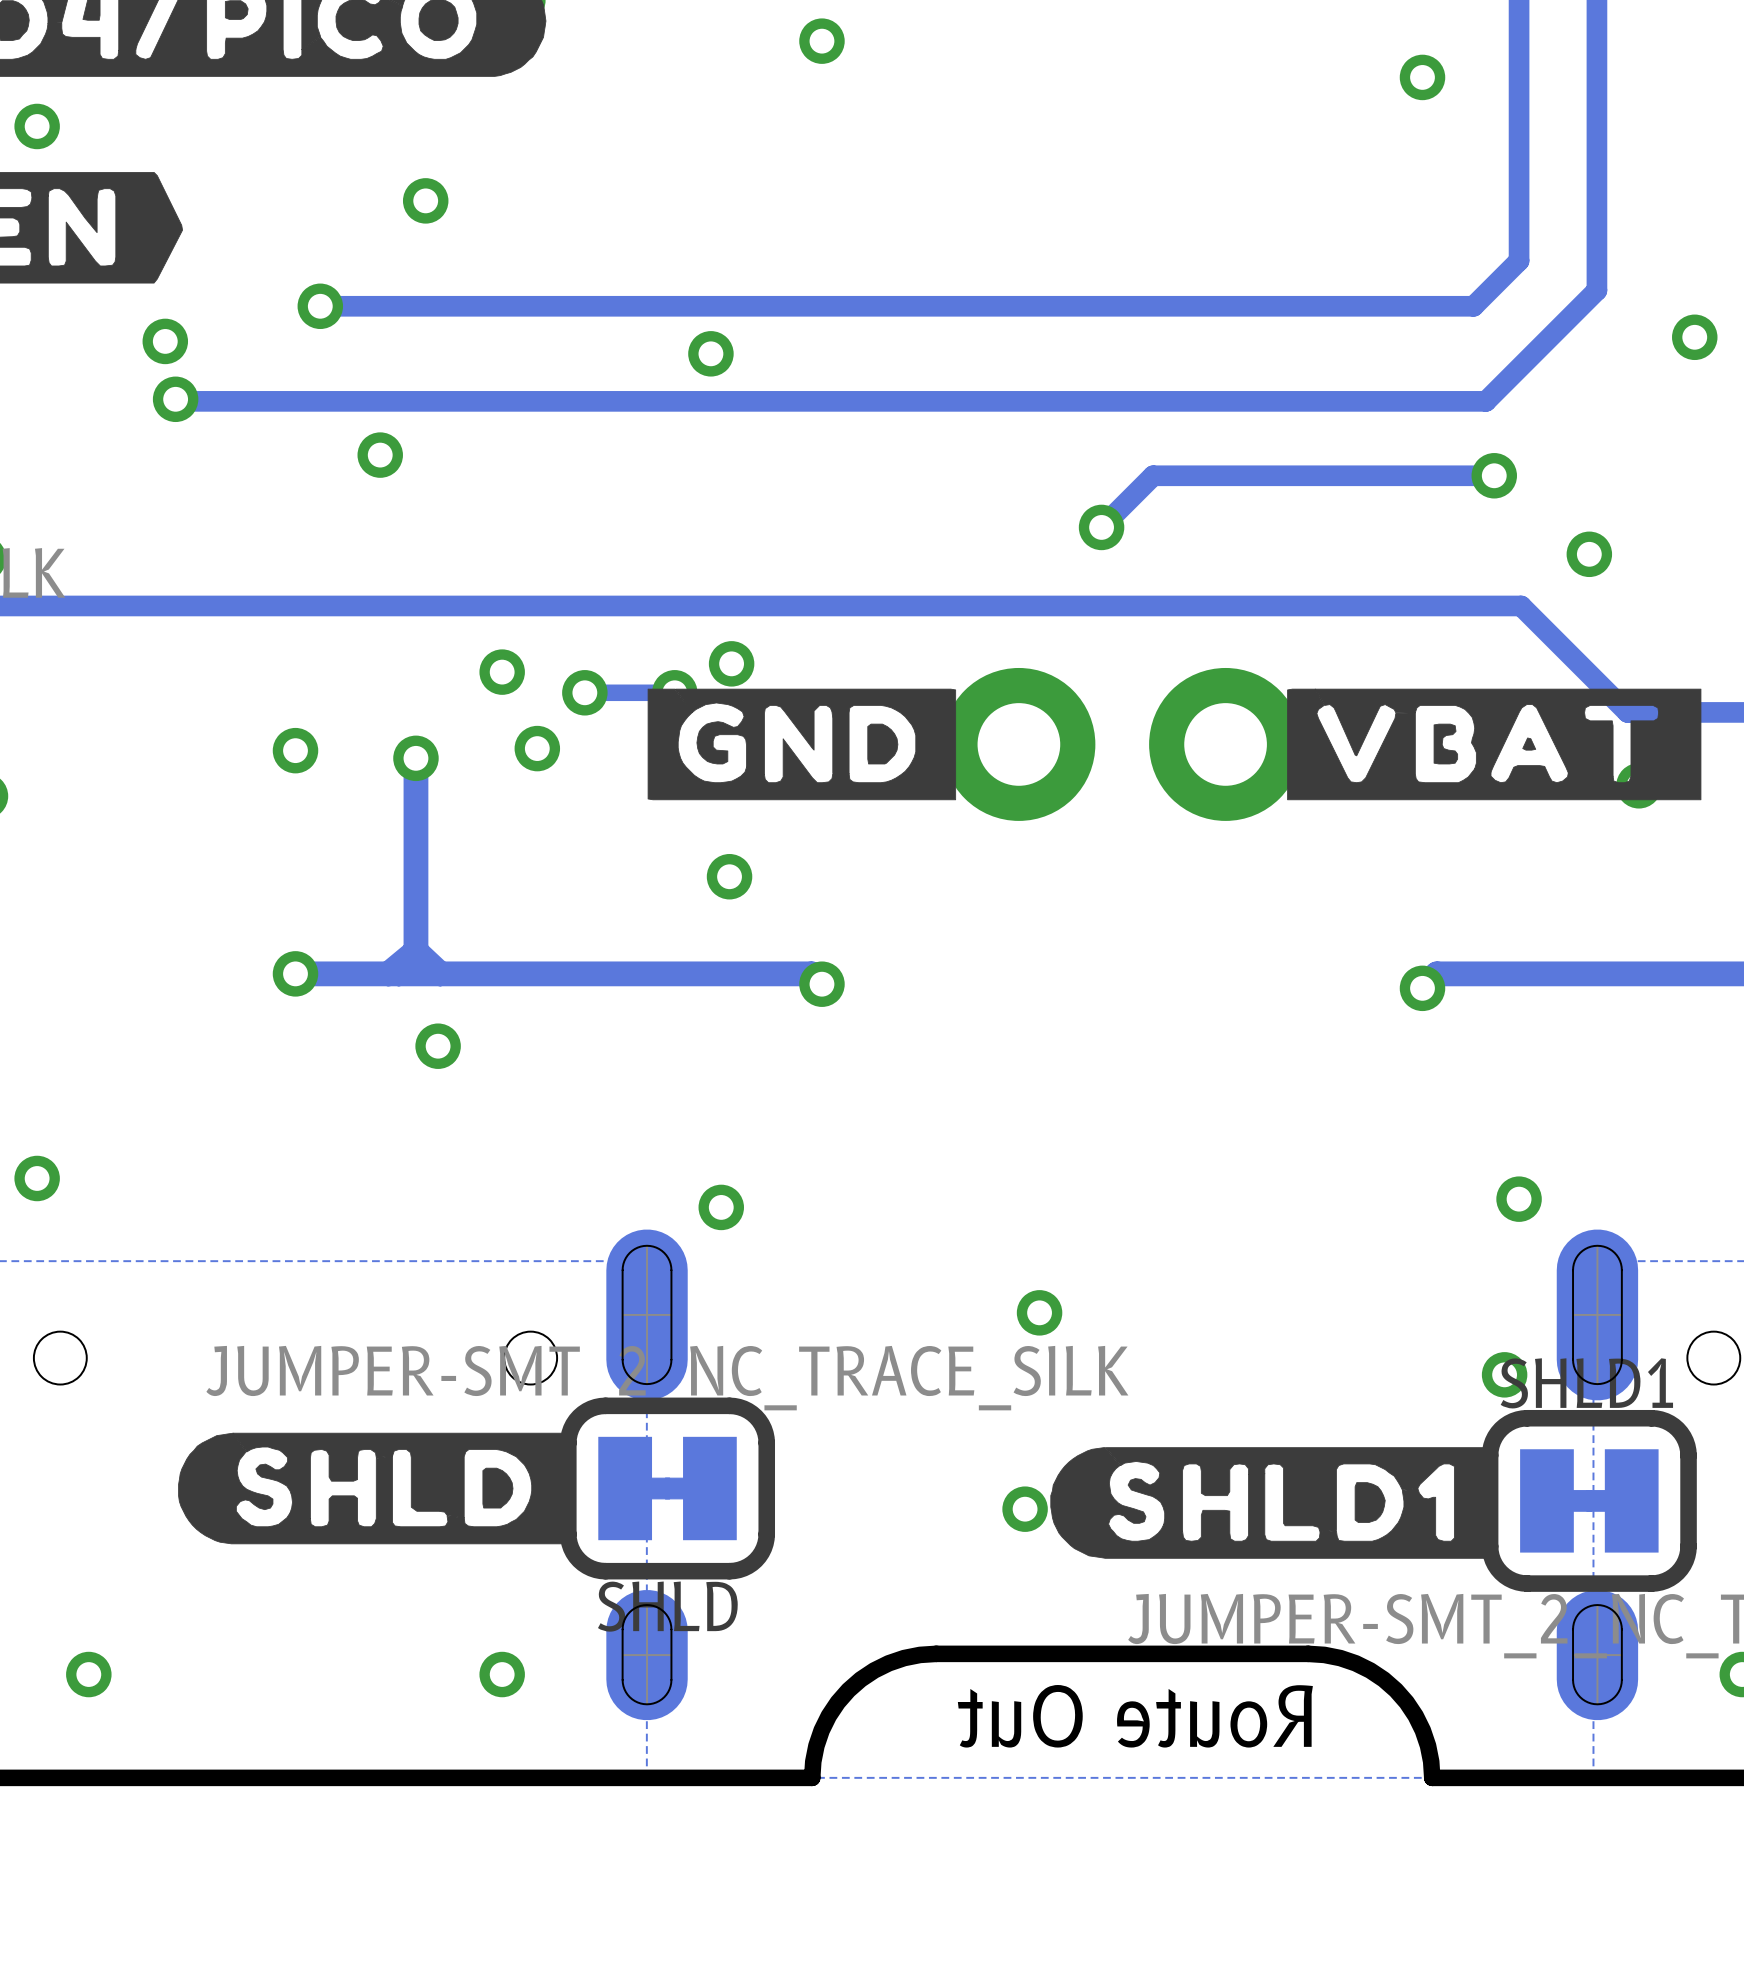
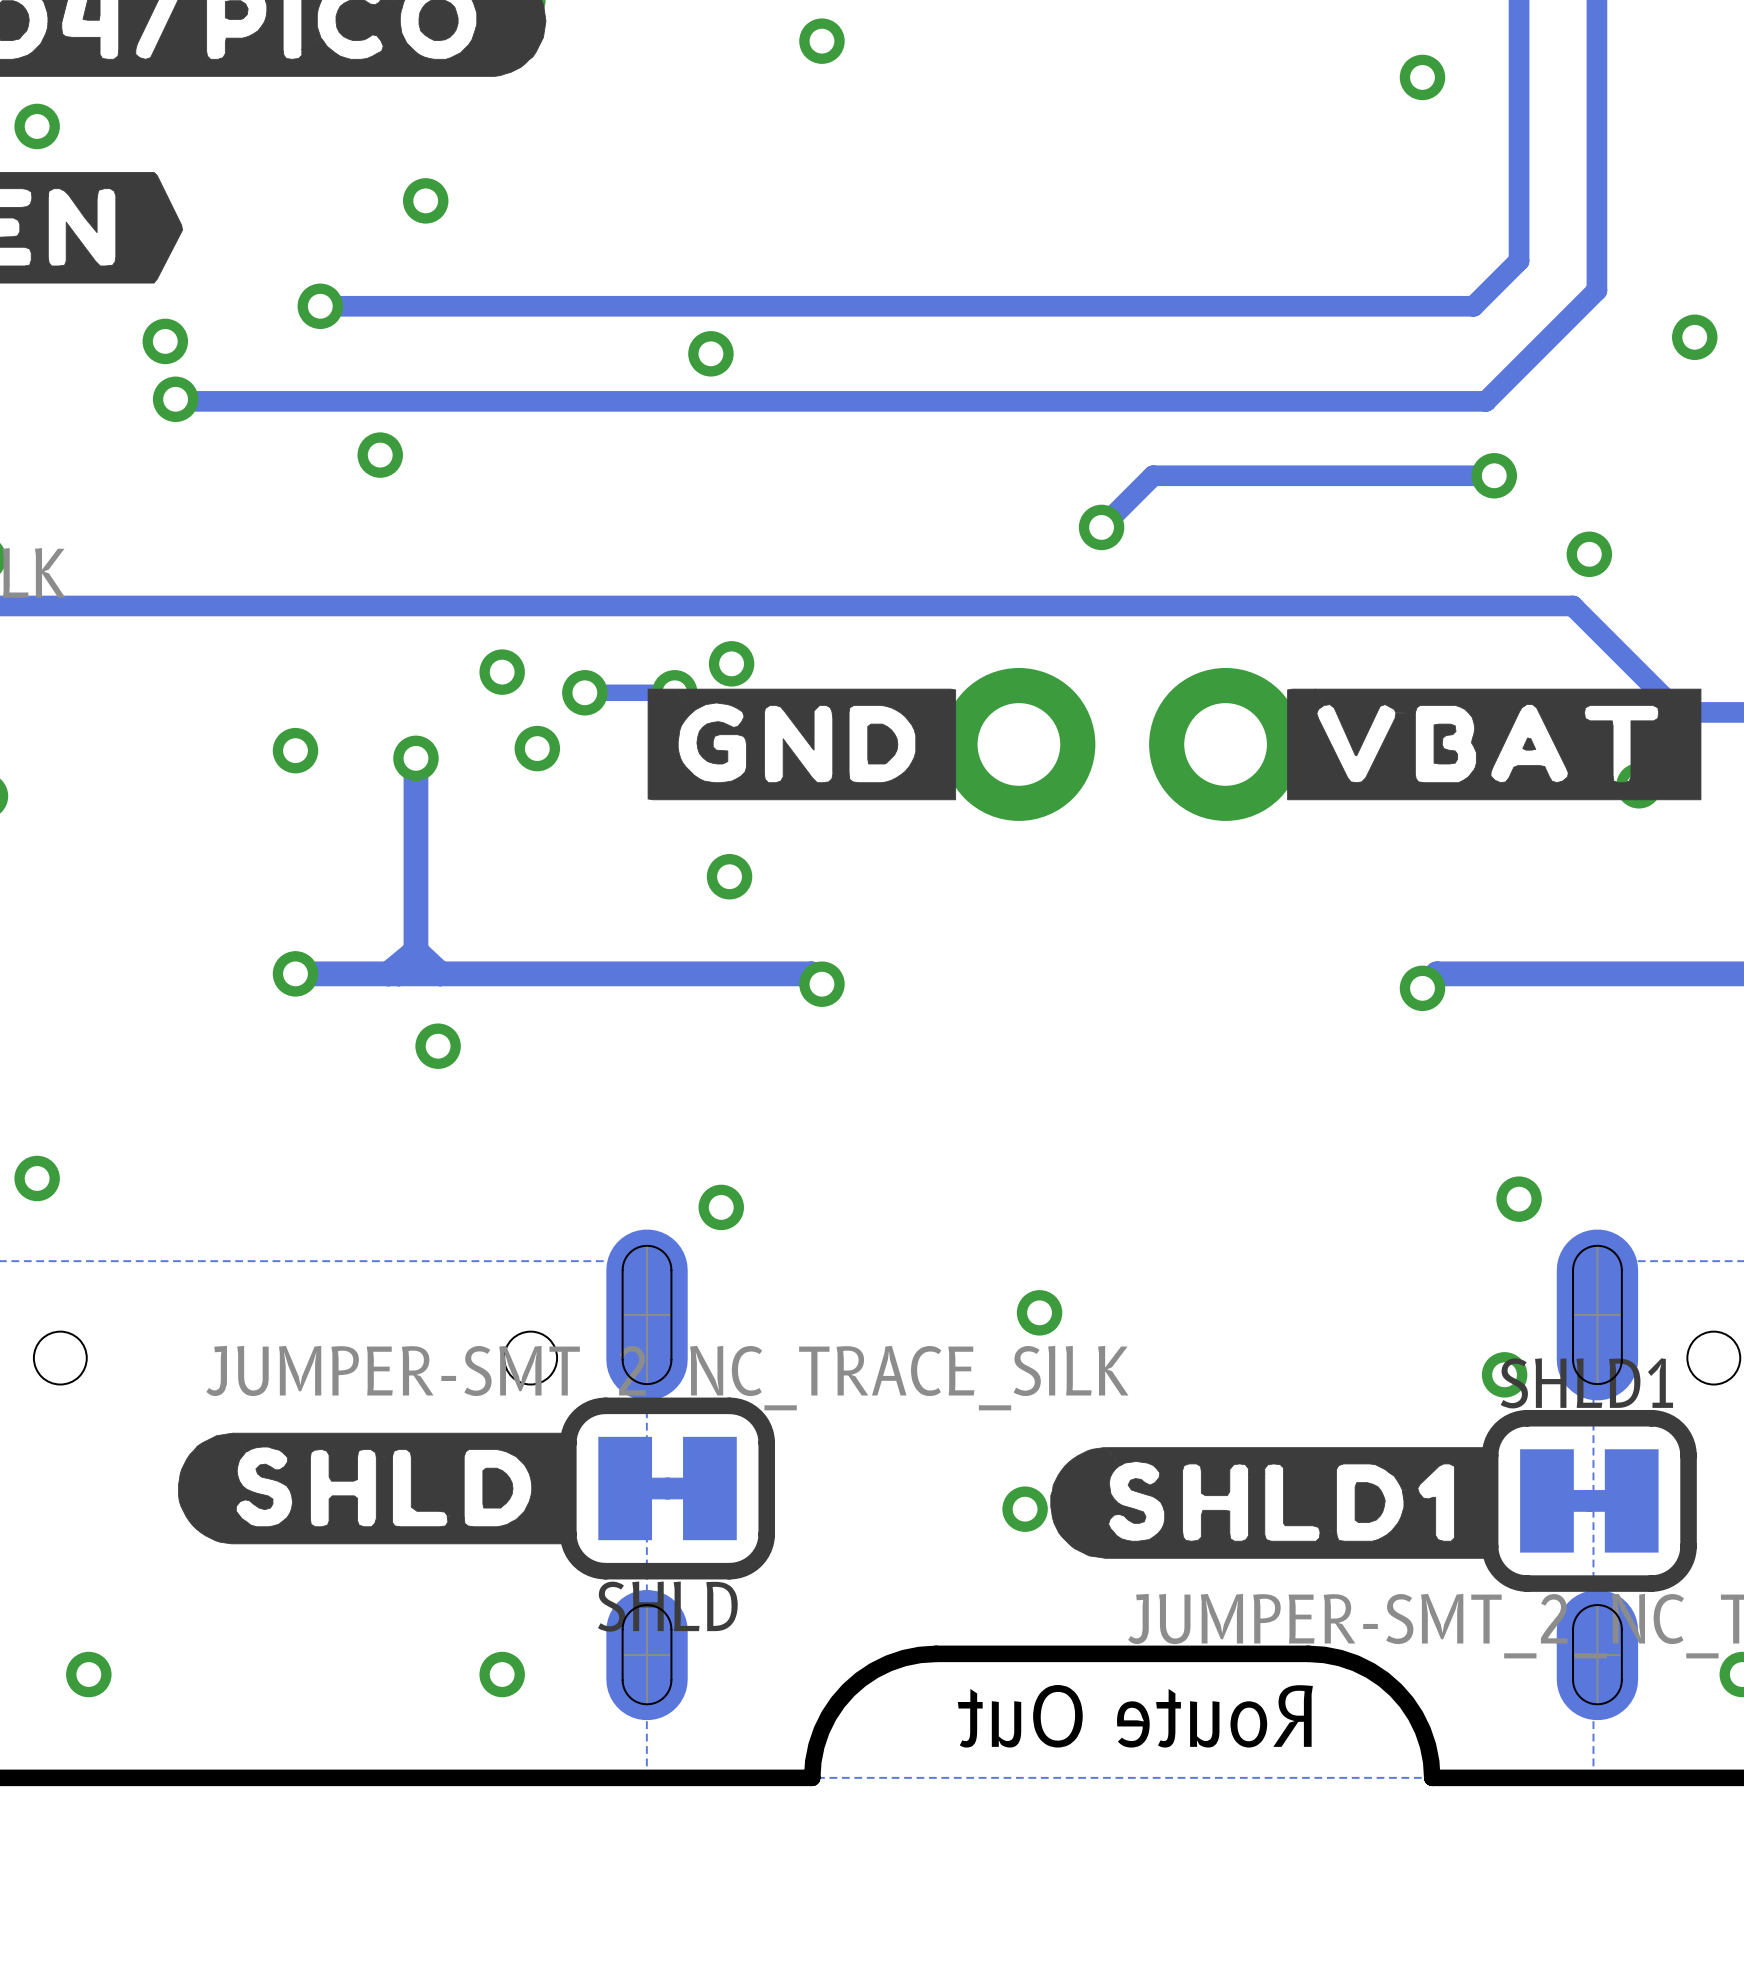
track: (1521, 605) (1627, 712) (1679, 712) -> (1521, 605) (1572, 605) (1679, 712)

